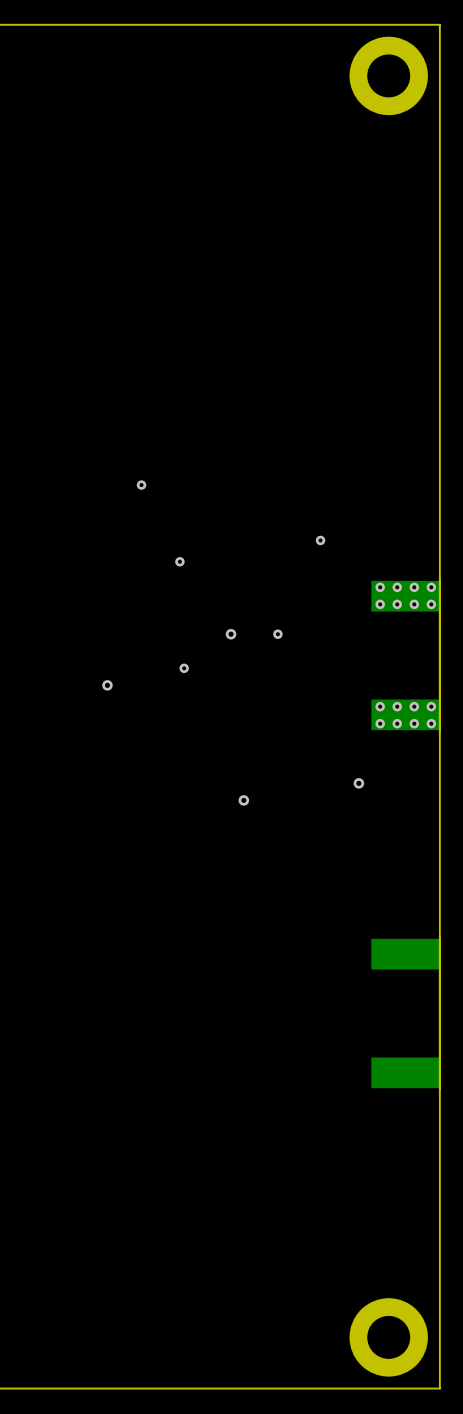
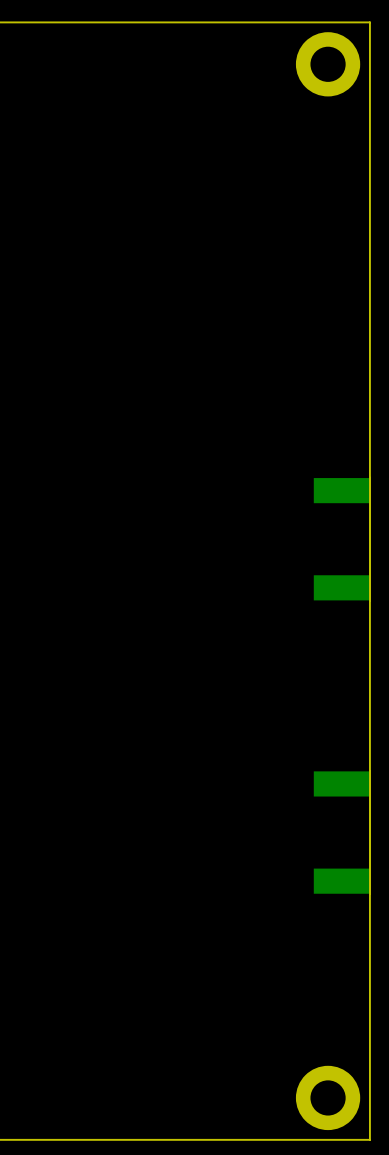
via: (141, 485) -> none
via: (320, 540) -> none
via: (179, 561) -> none
via: (380, 587) -> none
via: (397, 587) -> none
via: (414, 587) -> none
via: (431, 587) -> none
via: (380, 604) -> none
via: (397, 604) -> none
via: (414, 604) -> none
via: (431, 604) -> none
via: (231, 634) -> none
via: (277, 634) -> none
via: (184, 668) -> none
via: (107, 685) -> none
via: (380, 706) -> none
via: (397, 706) -> none
via: (414, 706) -> none
via: (431, 706) -> none
via: (380, 723) -> none
via: (397, 723) -> none
via: (414, 723) -> none
via: (431, 723) -> none
via: (358, 783) -> none
via: (243, 800) -> none

